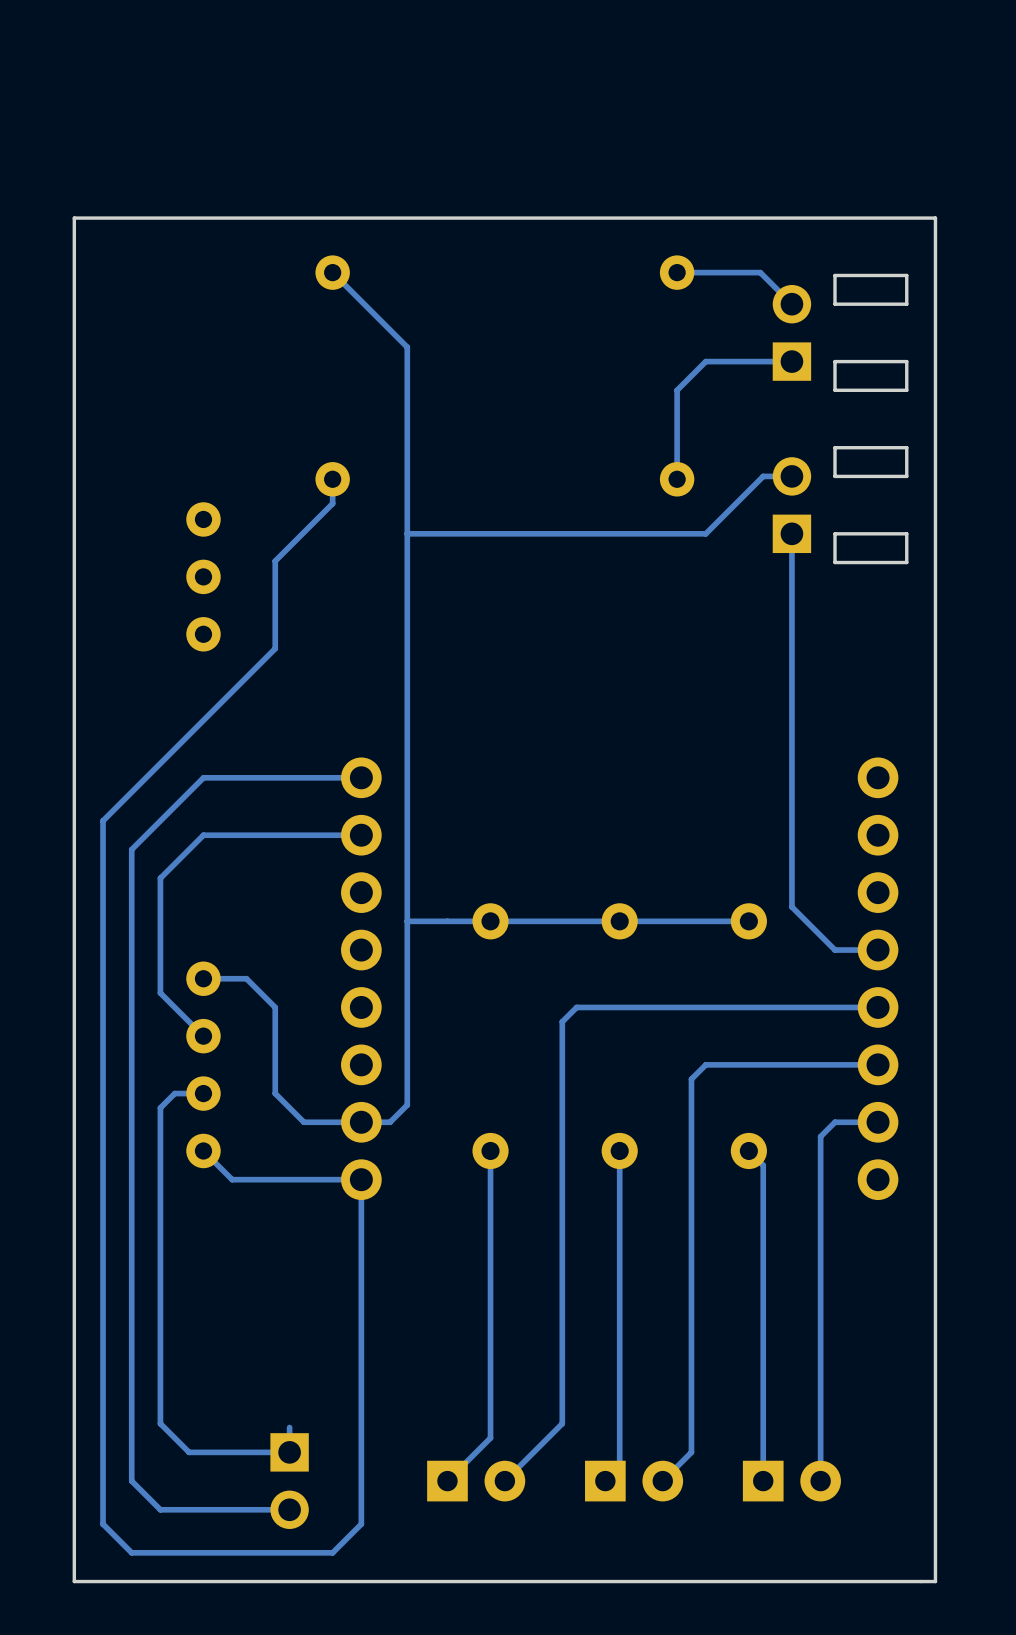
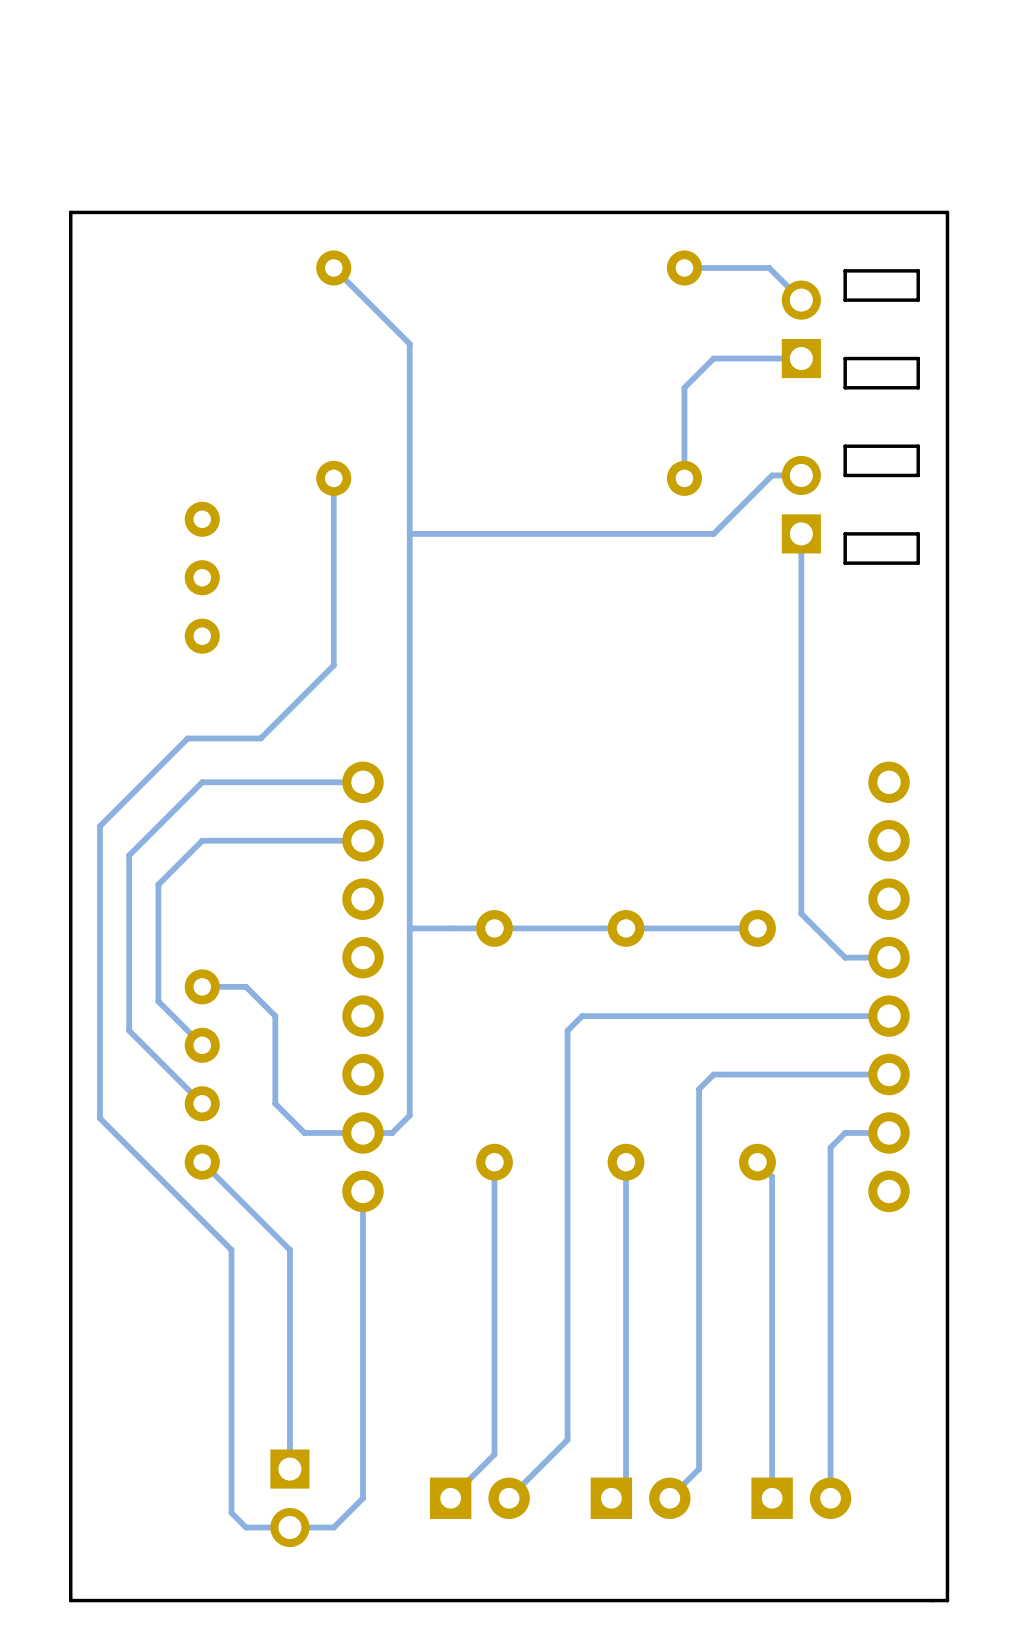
bottom track: (332, 503) (275, 561) (275, 648) (189, 734) -> (333, 503) (333, 665) (260, 738) (187, 738)
bottom track: (131, 1021) (131, 1481) (160, 1509) (246, 1509) -> (99, 1118) (231, 1249) (231, 1512) (246, 1527)
bottom track: (203, 1093) (174, 1093) (160, 1107) (160, 1423) (189, 1452) (289, 1452) -> (202, 1103) (129, 1030)
bottom track: (103, 1107) (103, 1524) (131, 1552) (332, 1552) (361, 1524) (361, 1481) -> (289, 1527) (333, 1527) (362, 1498)
bottom track: (361, 1179) (232, 1179) -> (289, 1443) (289, 1249) (231, 1191)

